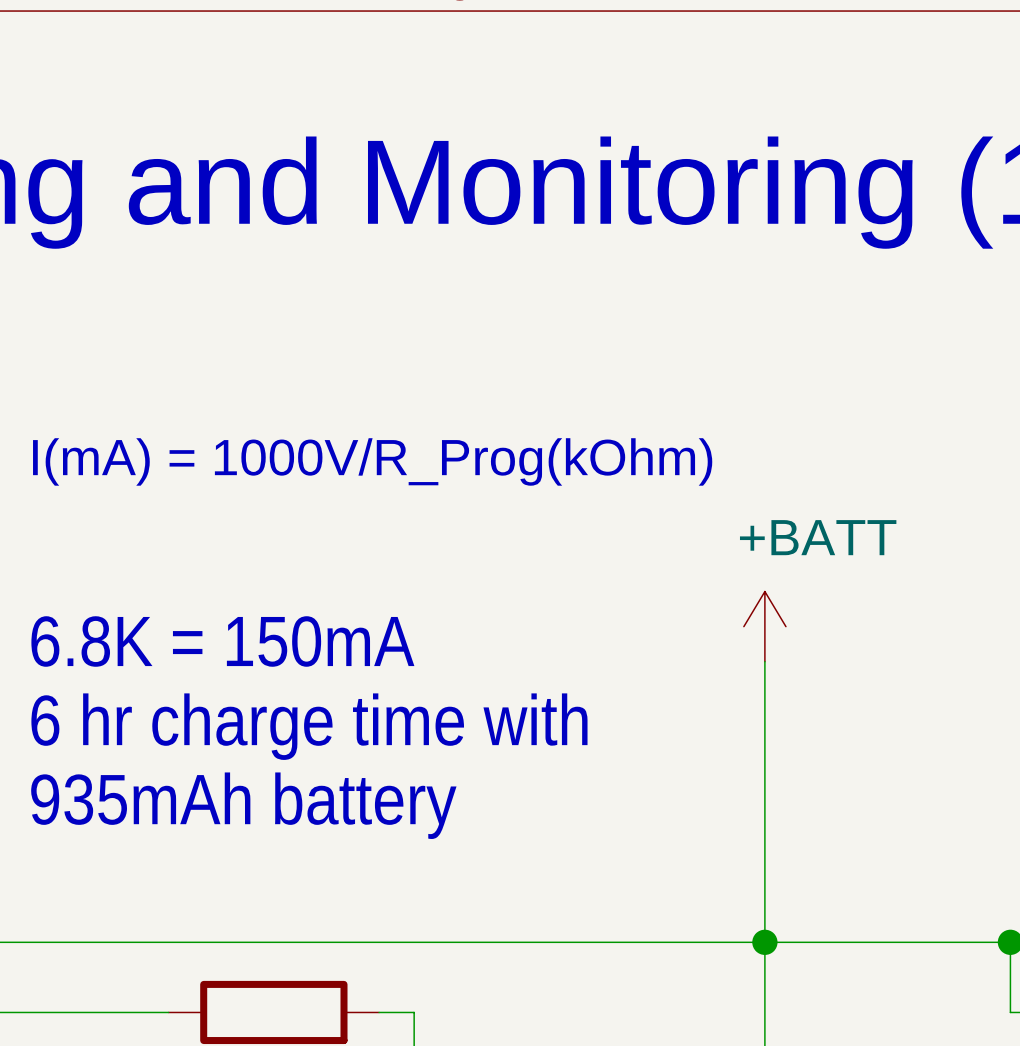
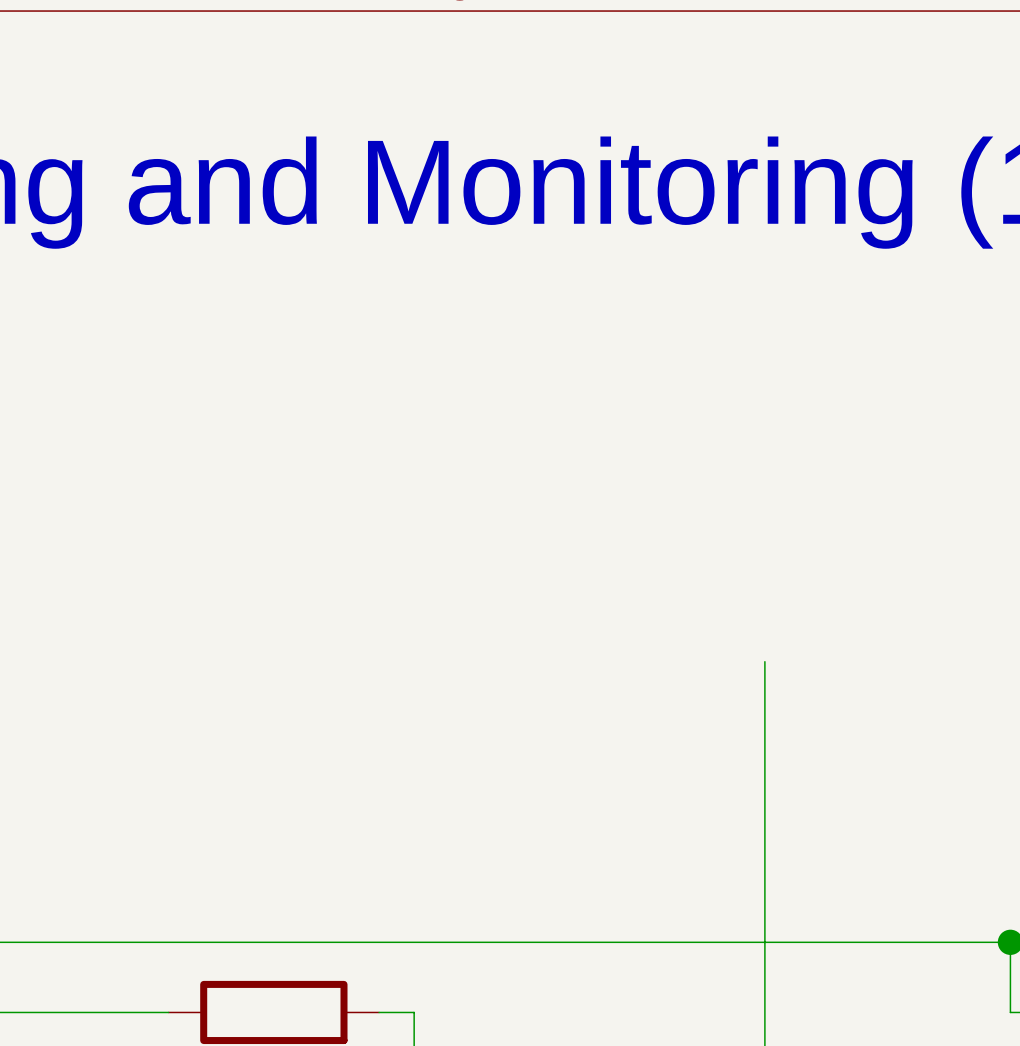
text: I(mA) = 1000V/R_Prog(kOhm) (372, 461) -> none
power symbol: +BATT (764, 626) -> none
text: 6.8K = 150mA (222, 641) -> none
text: 6 hr charge time with (309, 726) -> none
text: 935mAh battery (243, 805) -> none
junction: (764, 942) -> none

